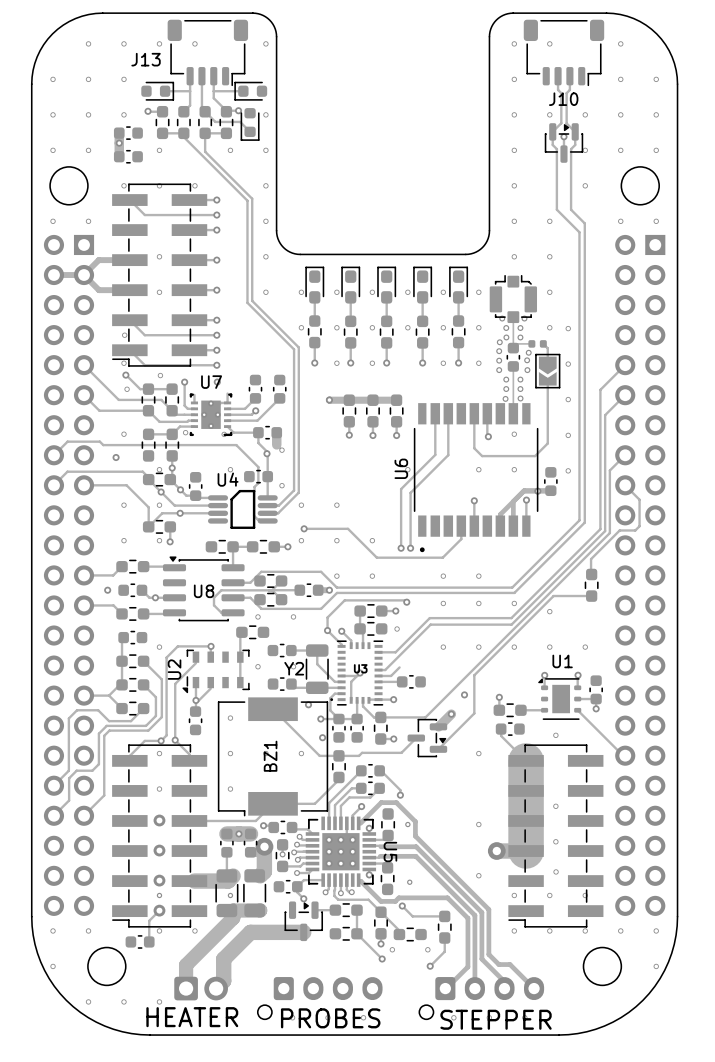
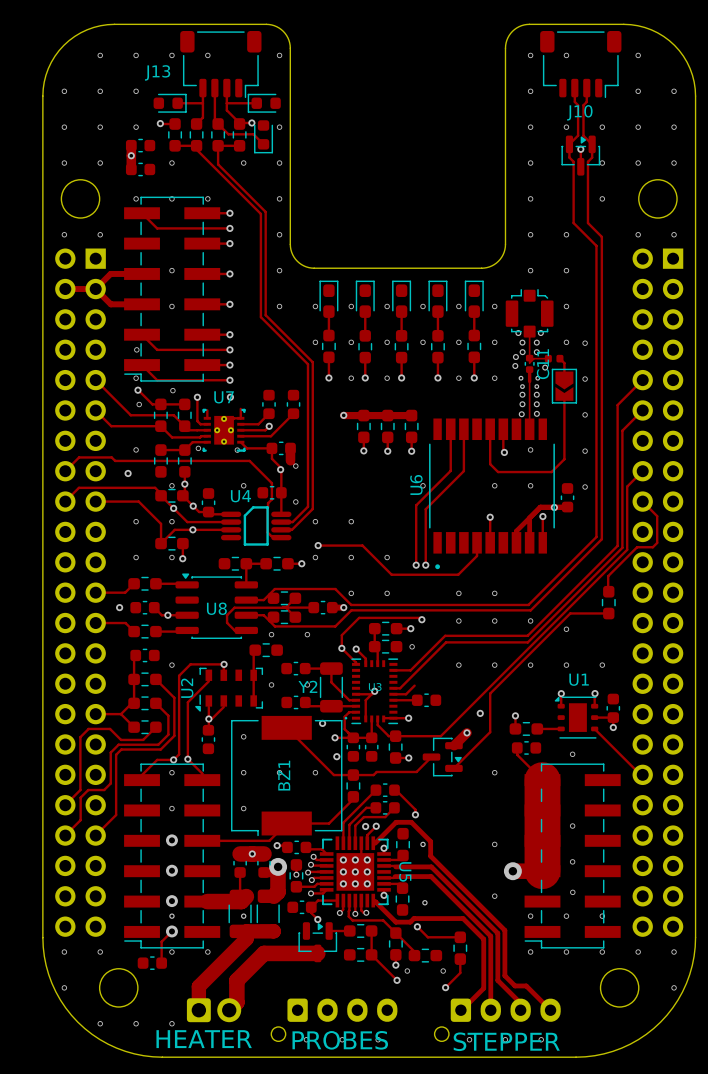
C11: none -> (529, 363)
track: none -> (529, 369) (529, 381)
part: (513, 357) -> none
via: (499, 360) -> none
via: (527, 360) -> none
via: none -> (521, 378)
via: none -> (537, 378)
via: (499, 370) -> none
via: (527, 370) -> none
via: none -> (522, 386)
via: none -> (536, 386)
via: none -> (365, 826)

